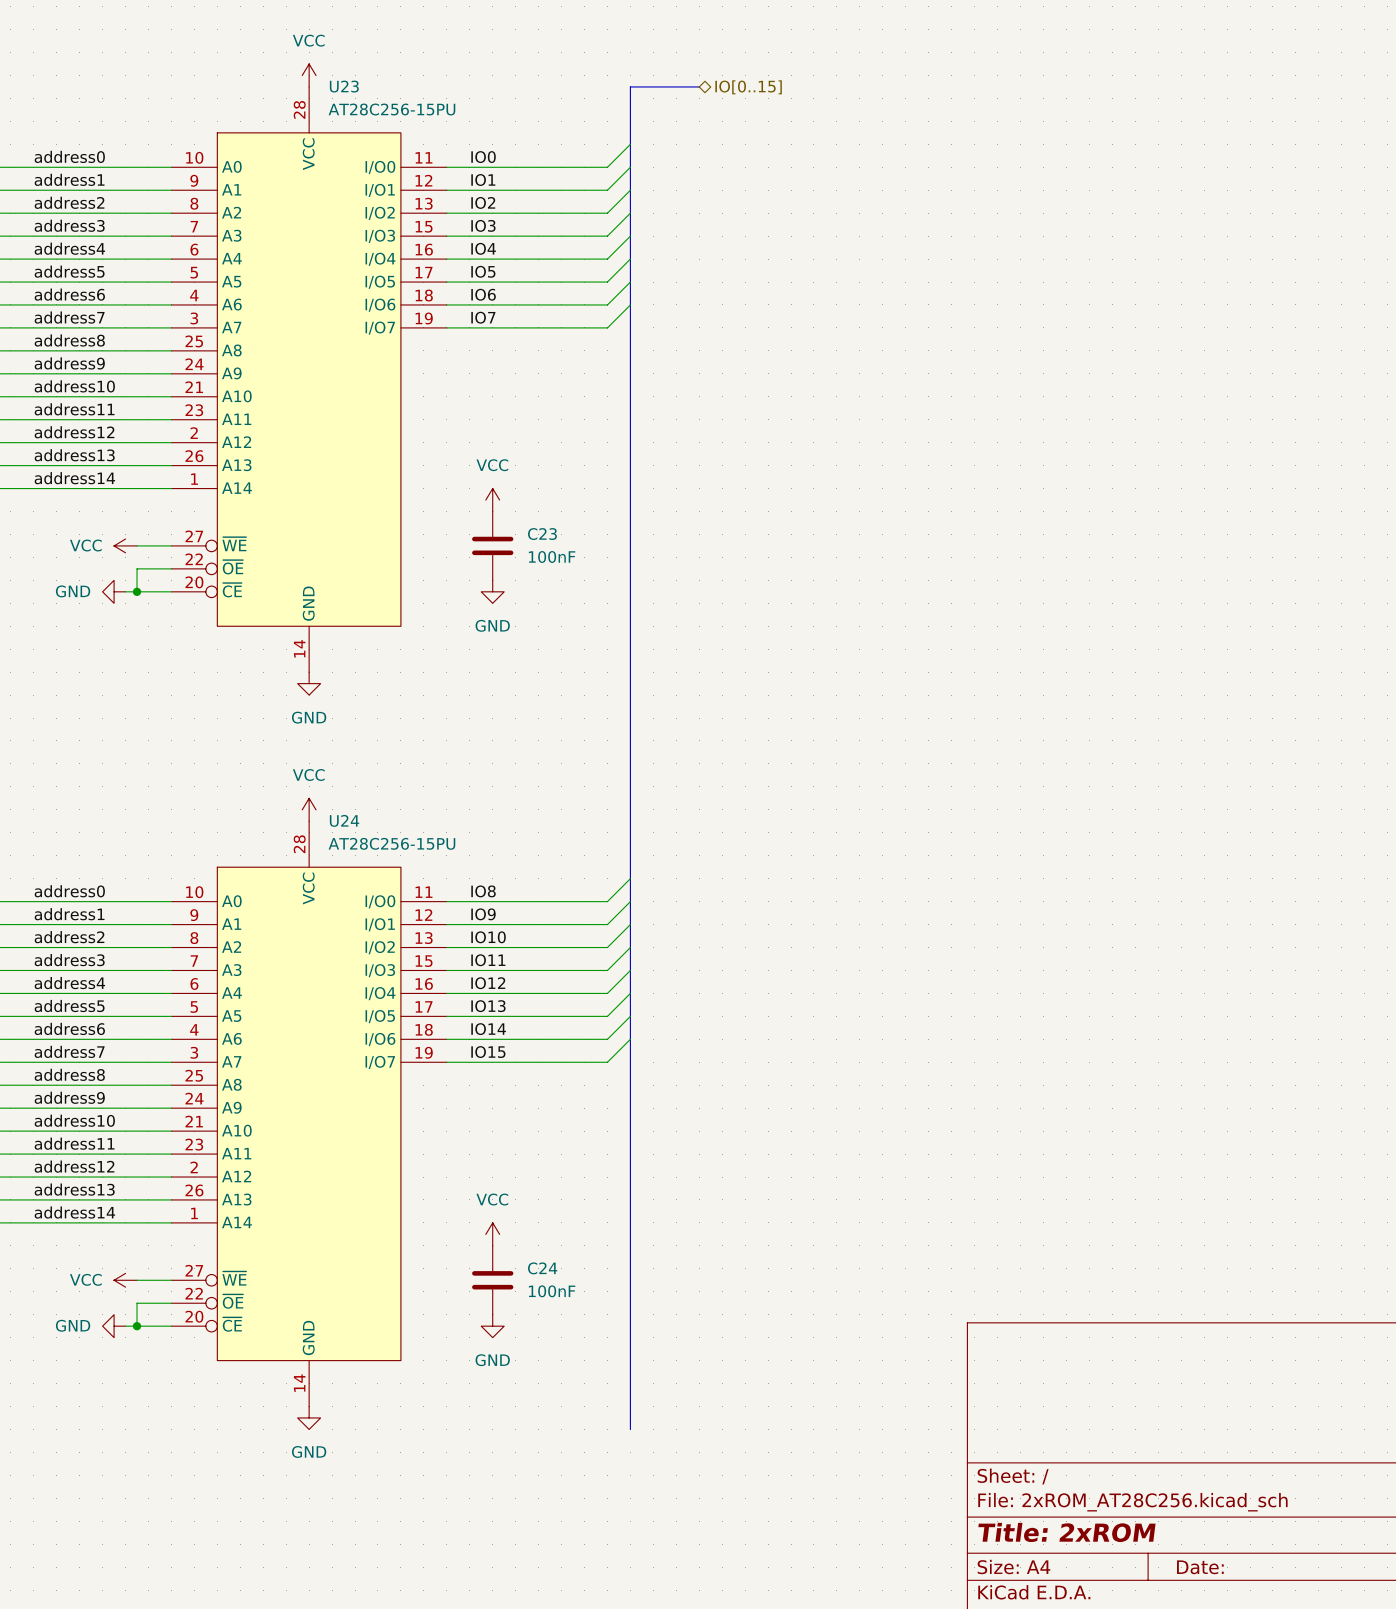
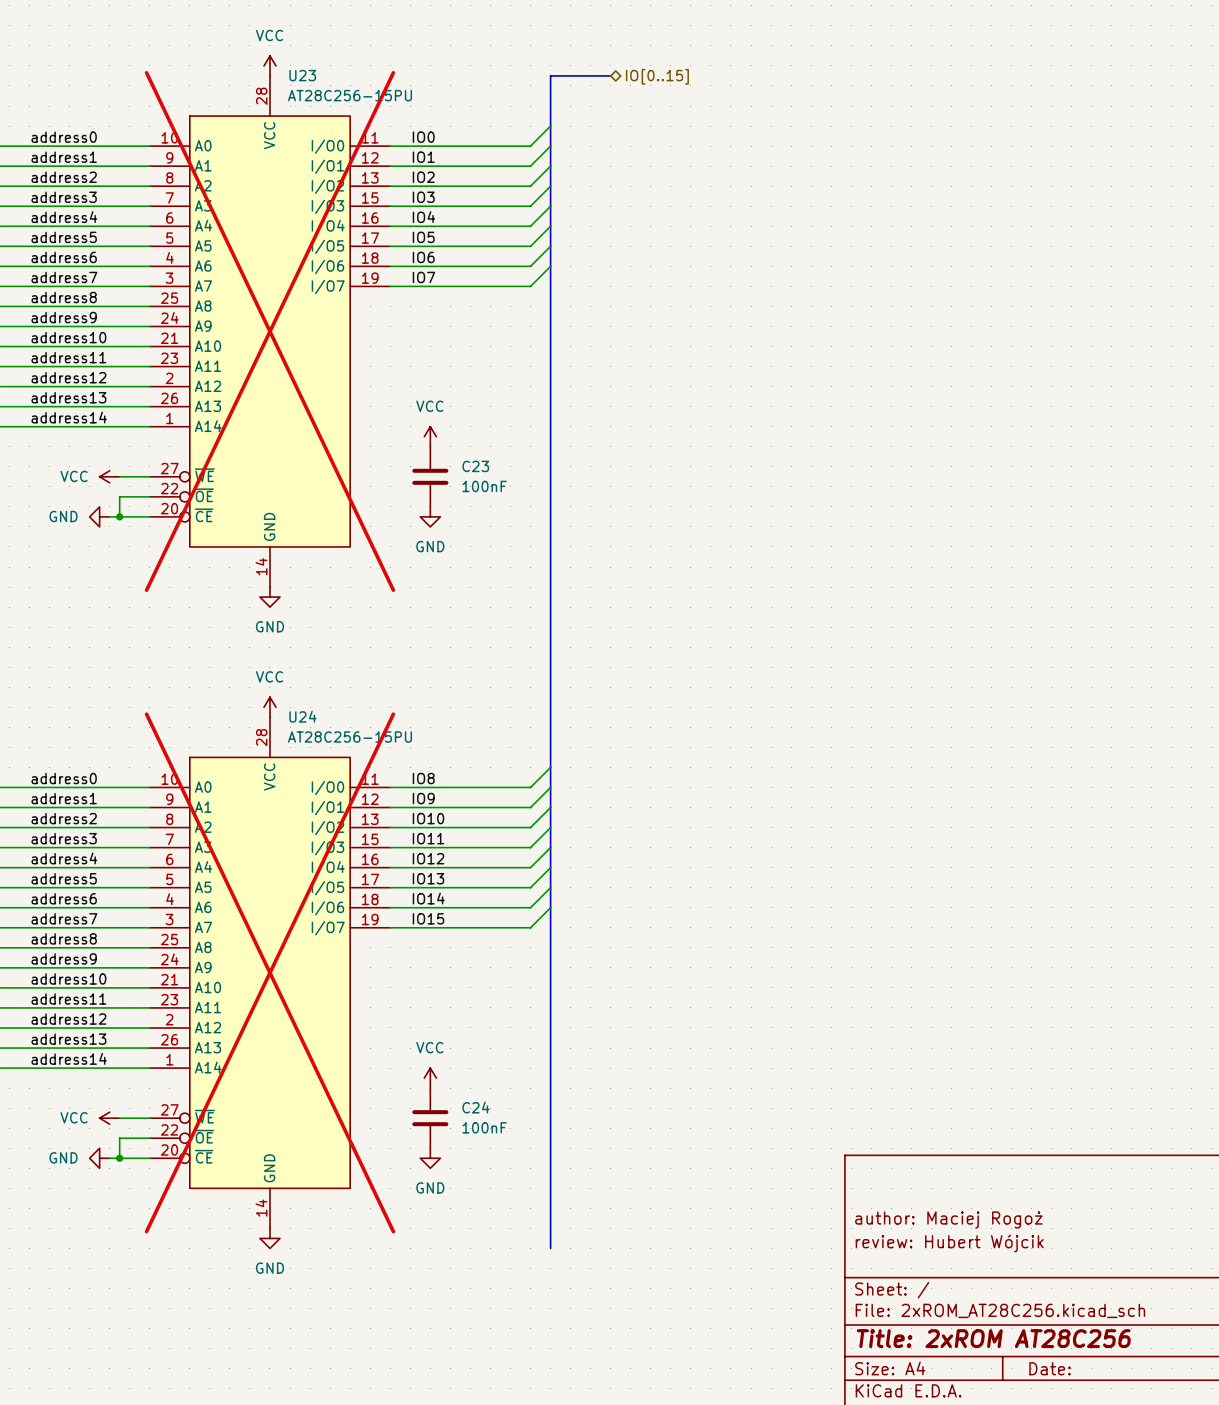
U23 do-not-place cross: none -> (269, 331)
U24 do-not-place cross: none -> (269, 972)
title block: none -> author: Maciej Rogoż (948, 1220)
title block: none -> review: Hubert Wójcik (949, 1243)
title block: Title: 2xROM (1066, 1532) -> Title: 2xROM AT28C256 (993, 1338)

